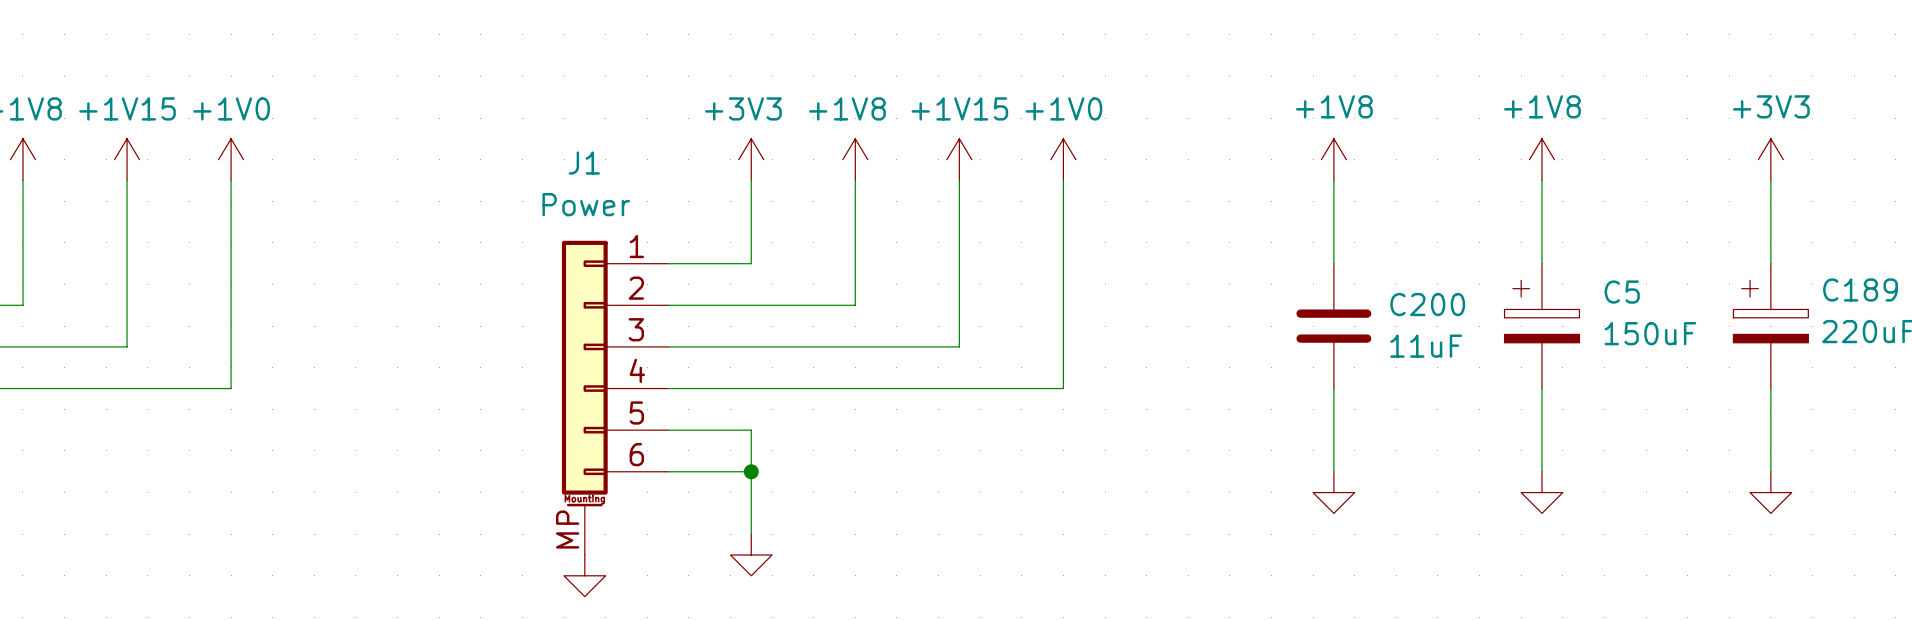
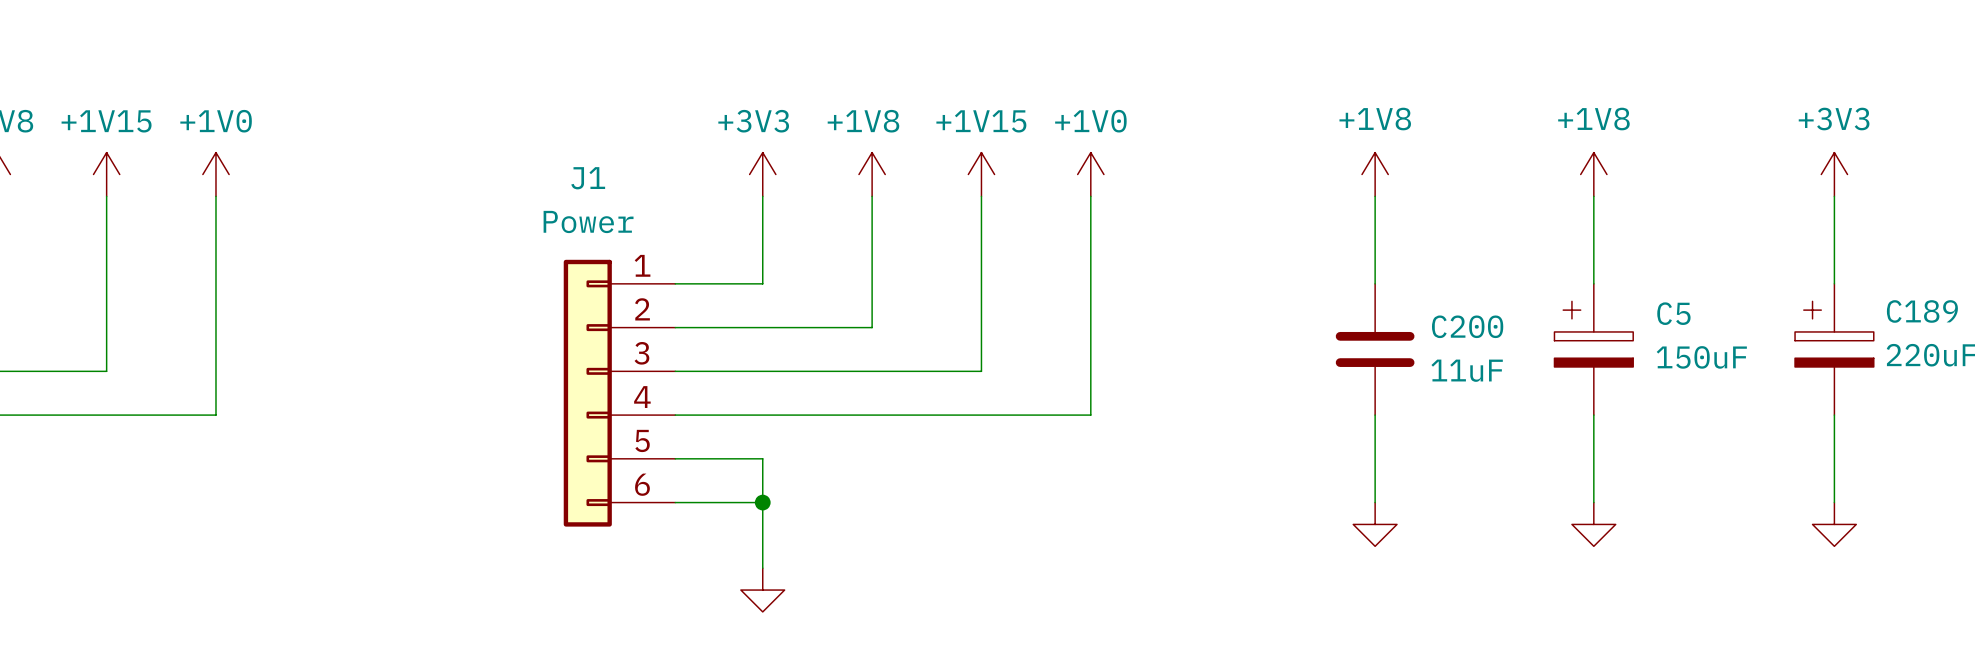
J1 symbol: [561, 240, 669, 556] -> [563, 259, 676, 527]
power symbol: (584, 575) -> none

